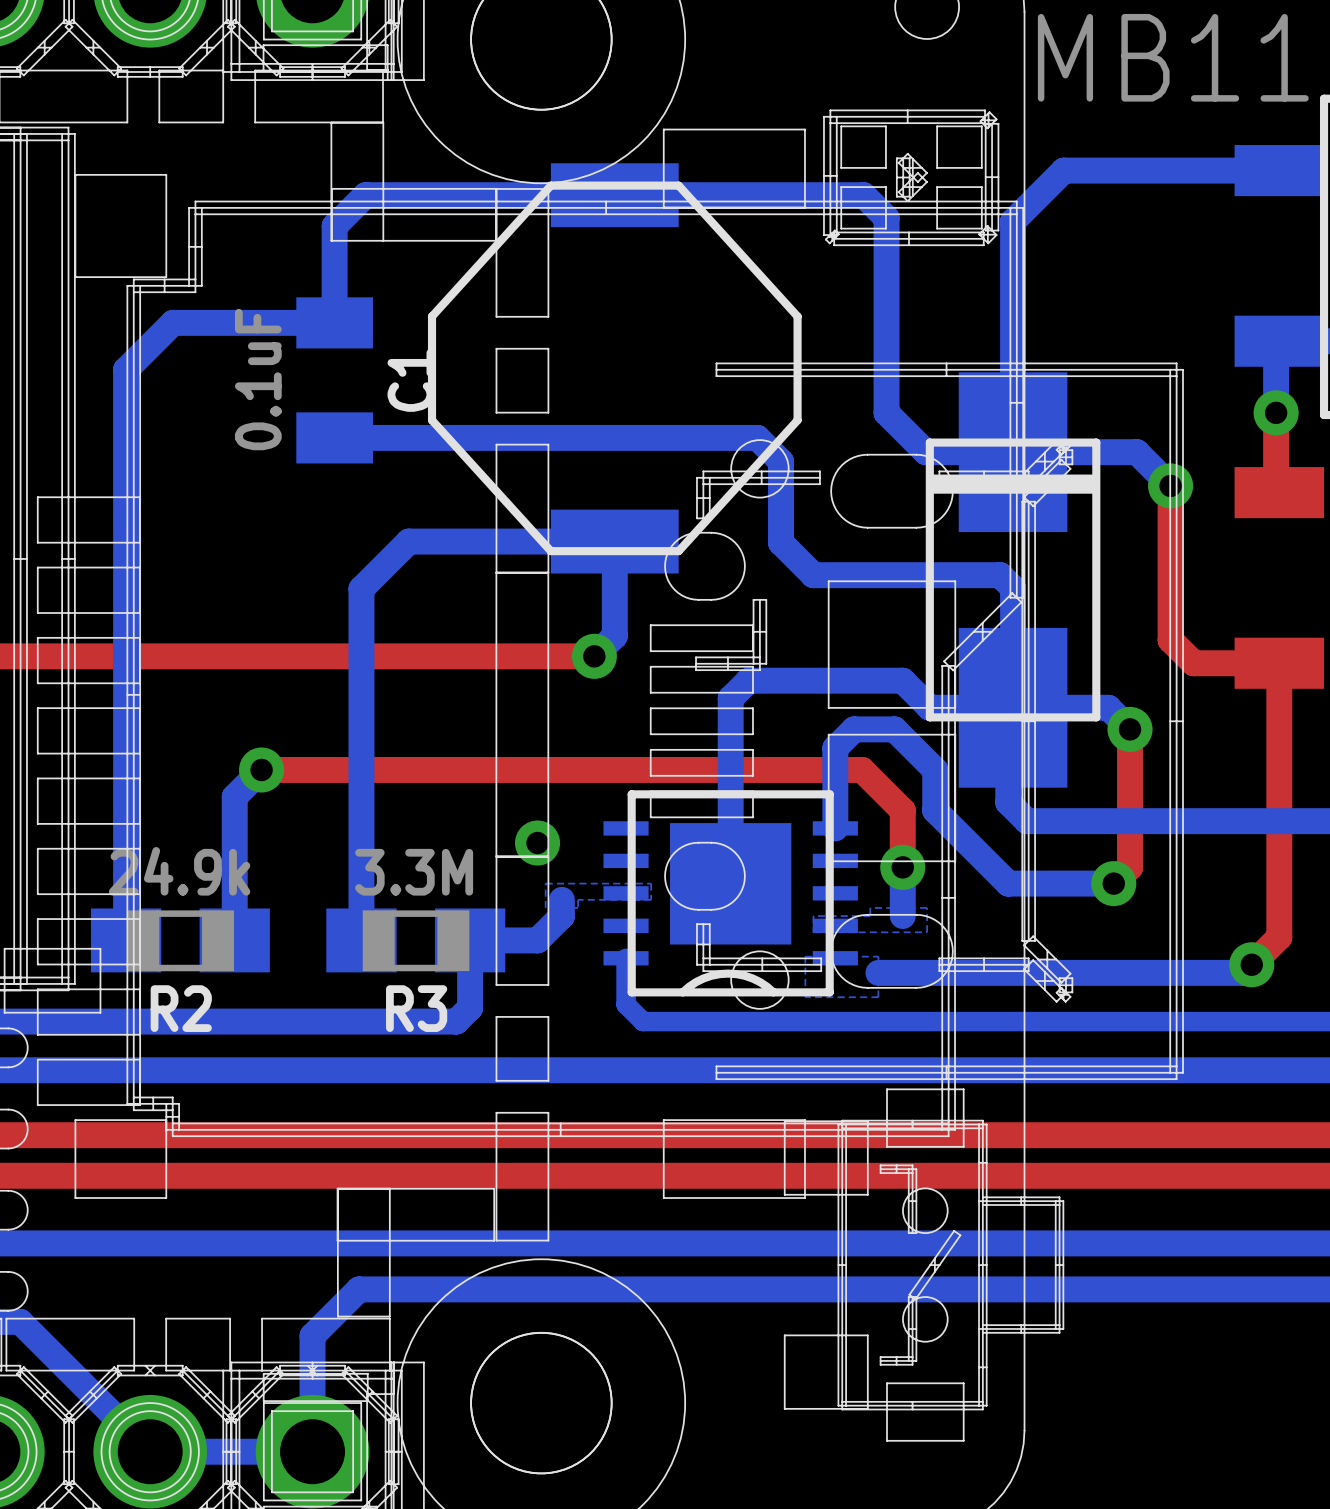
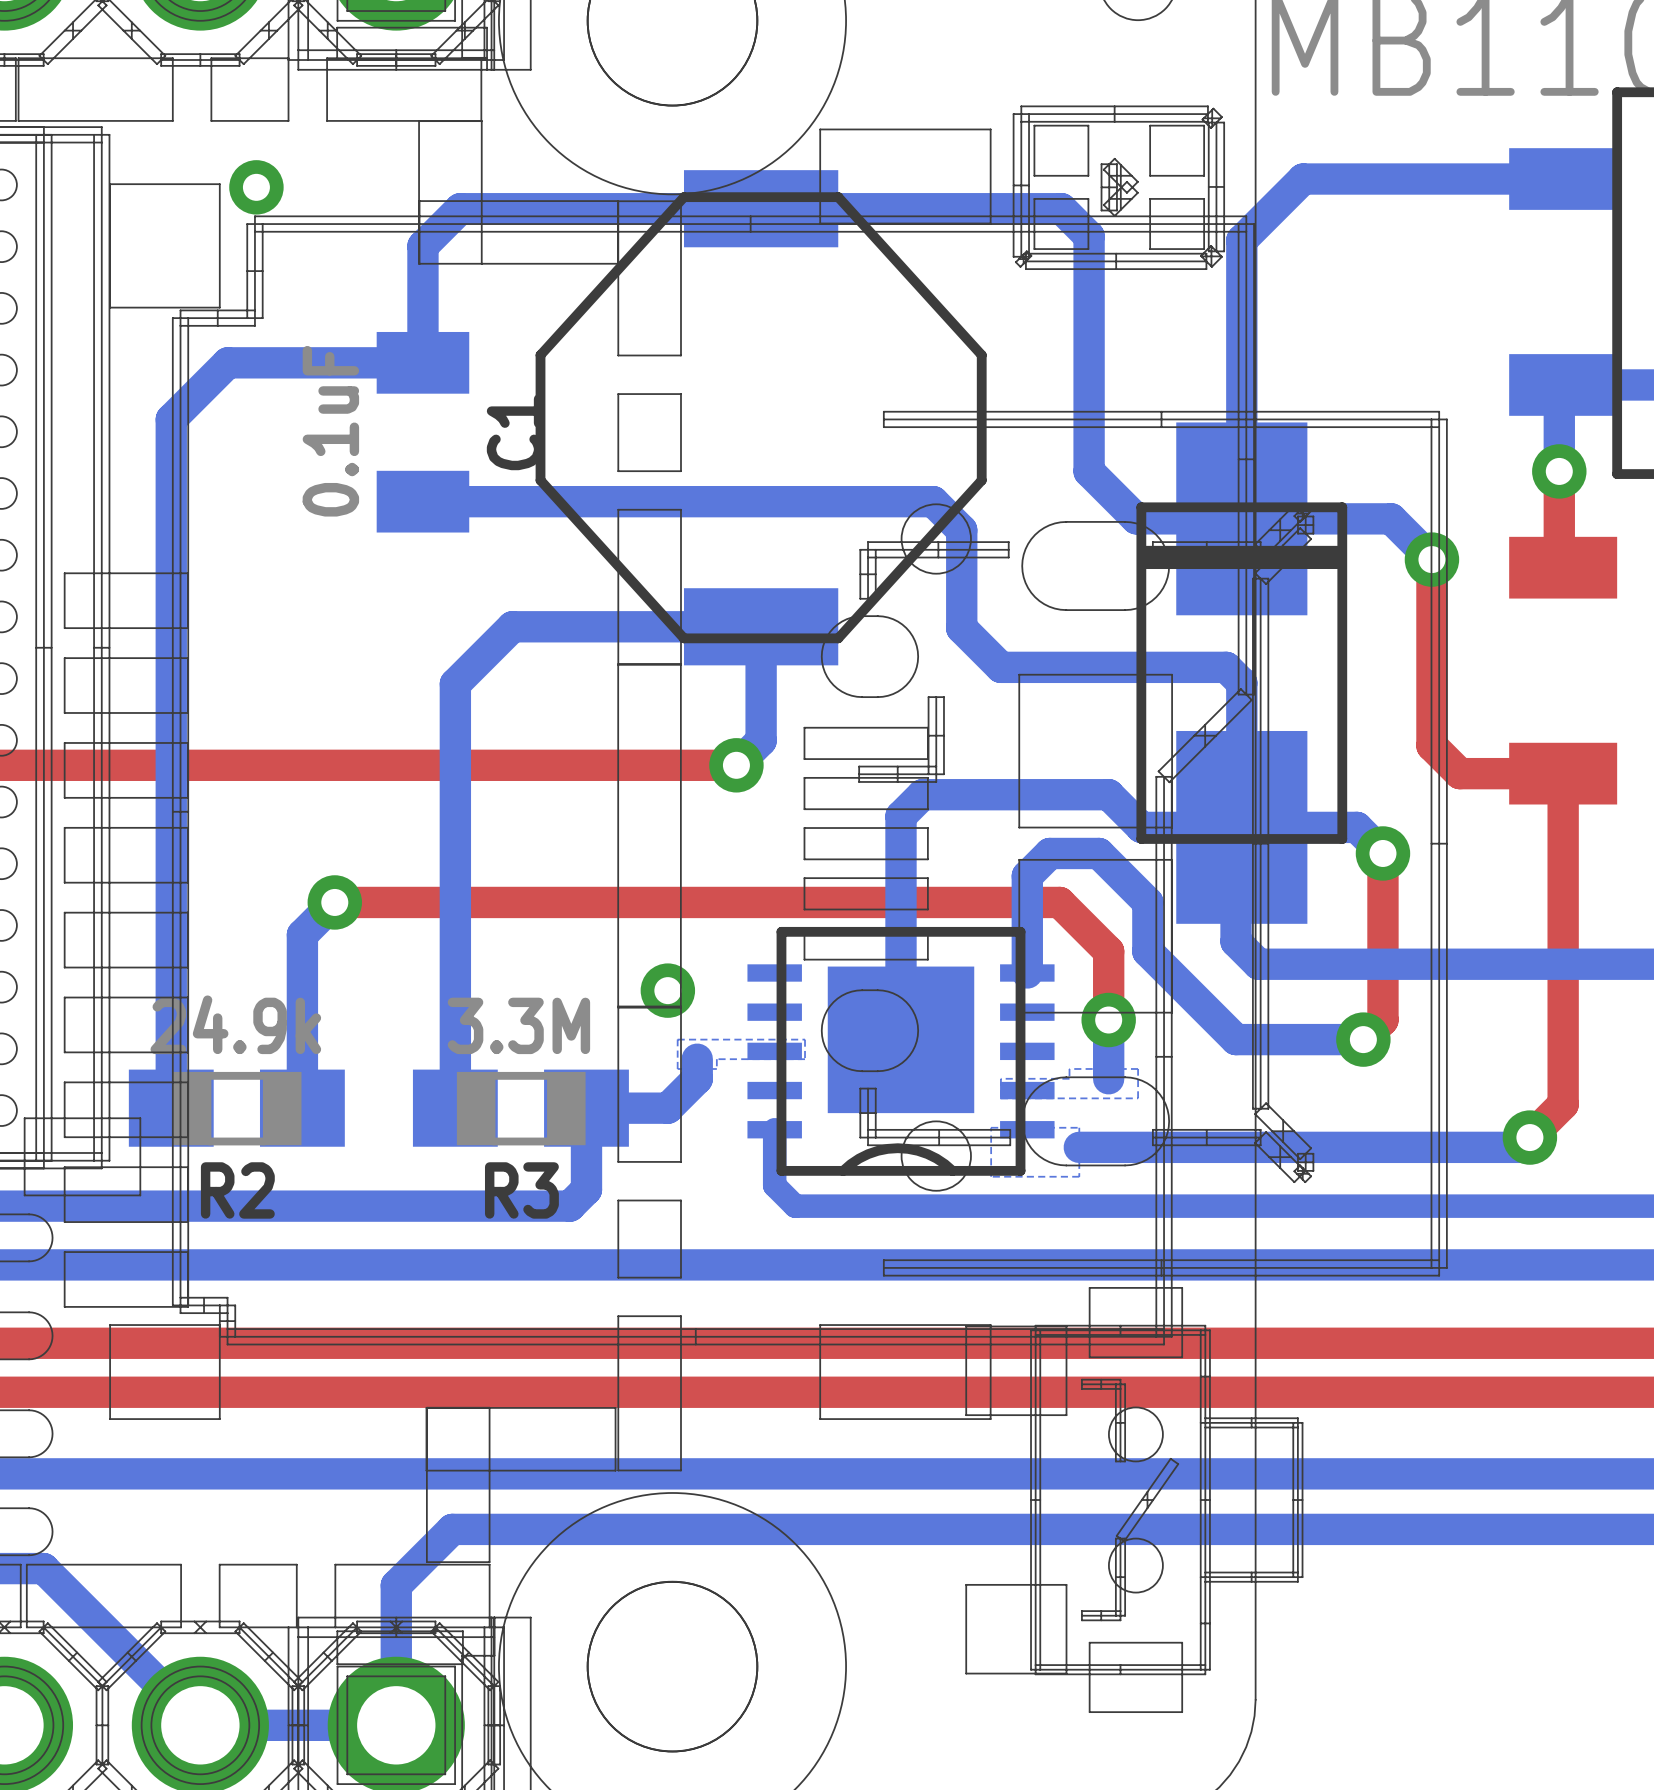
via: none -> (256, 187)

